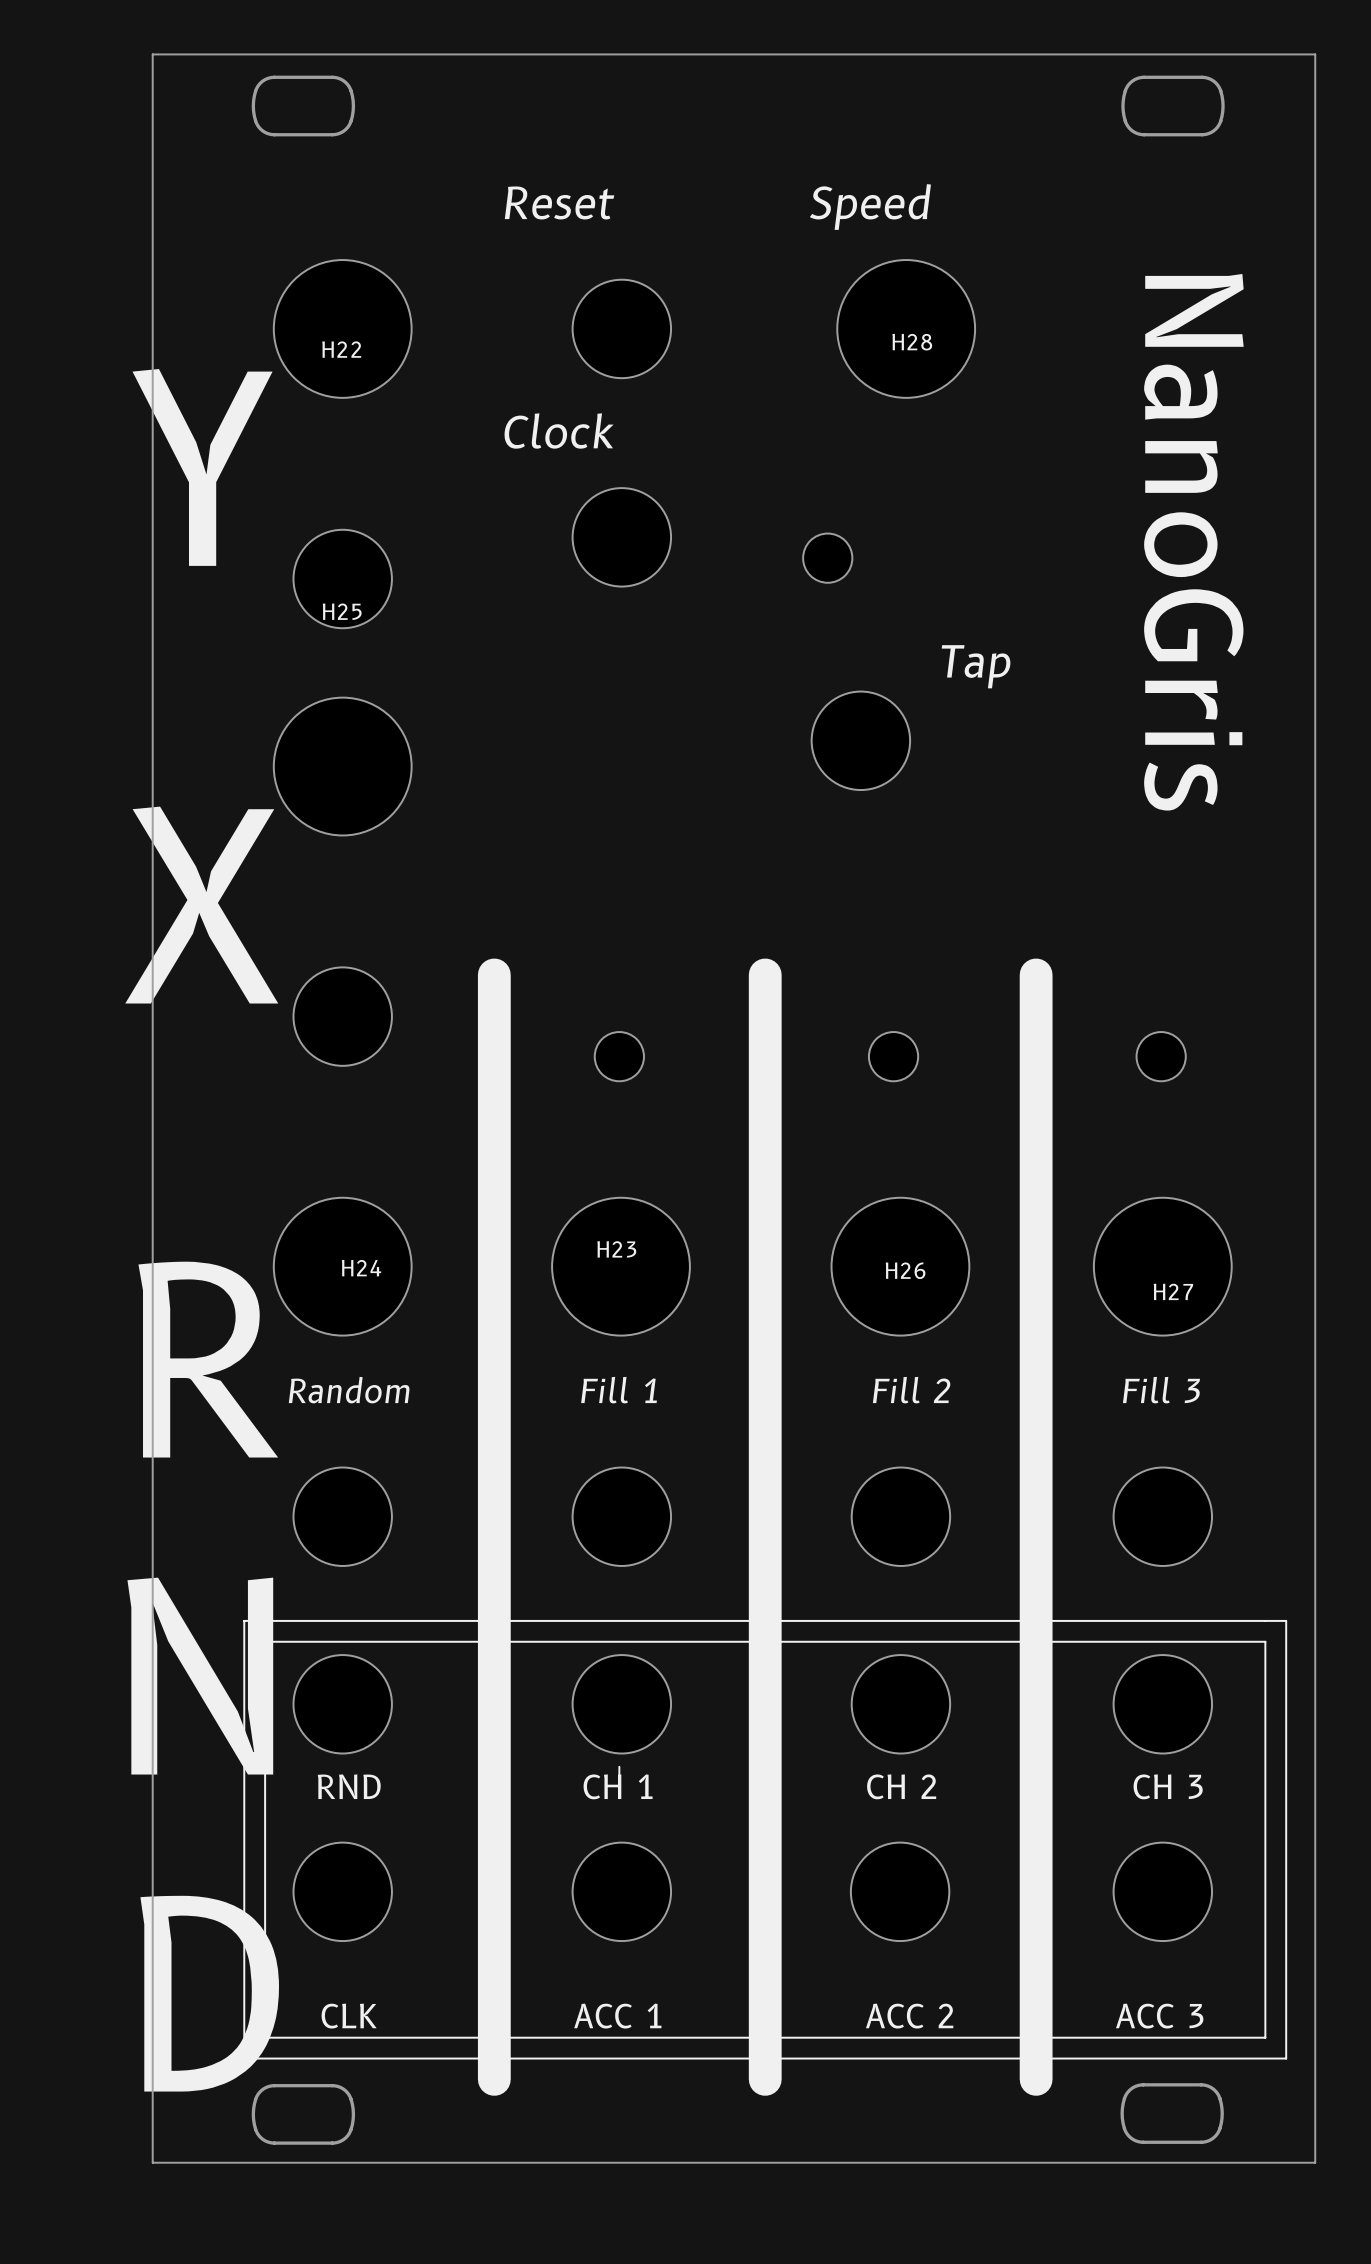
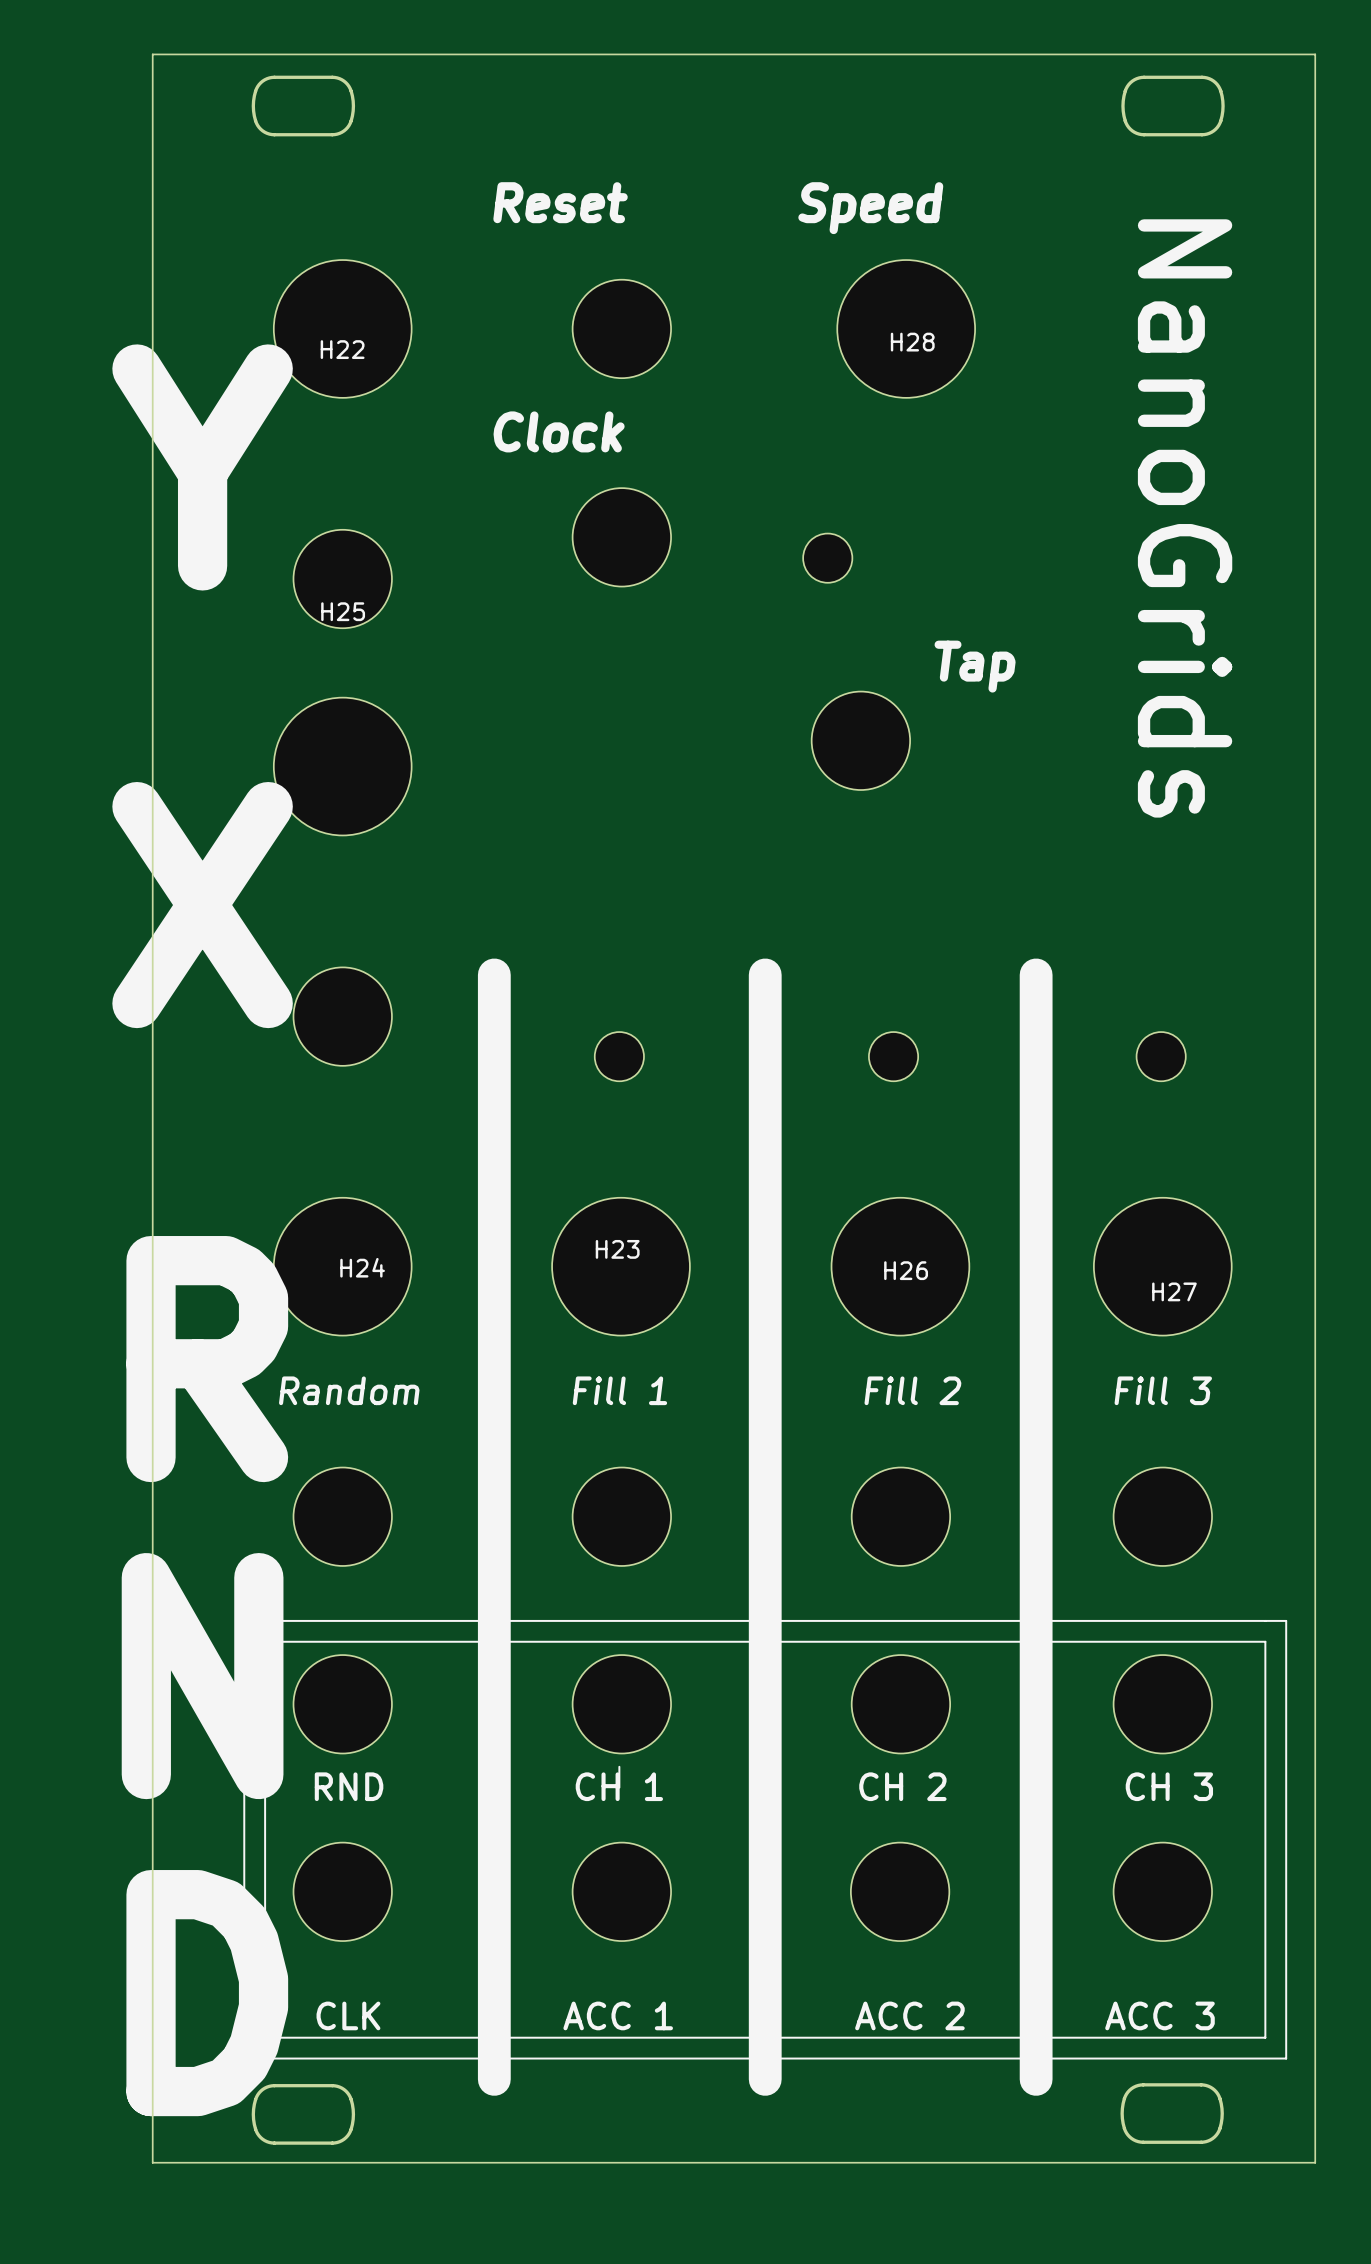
text: NanoGris (1193, 542) -> NanoGrids (1185, 518)

